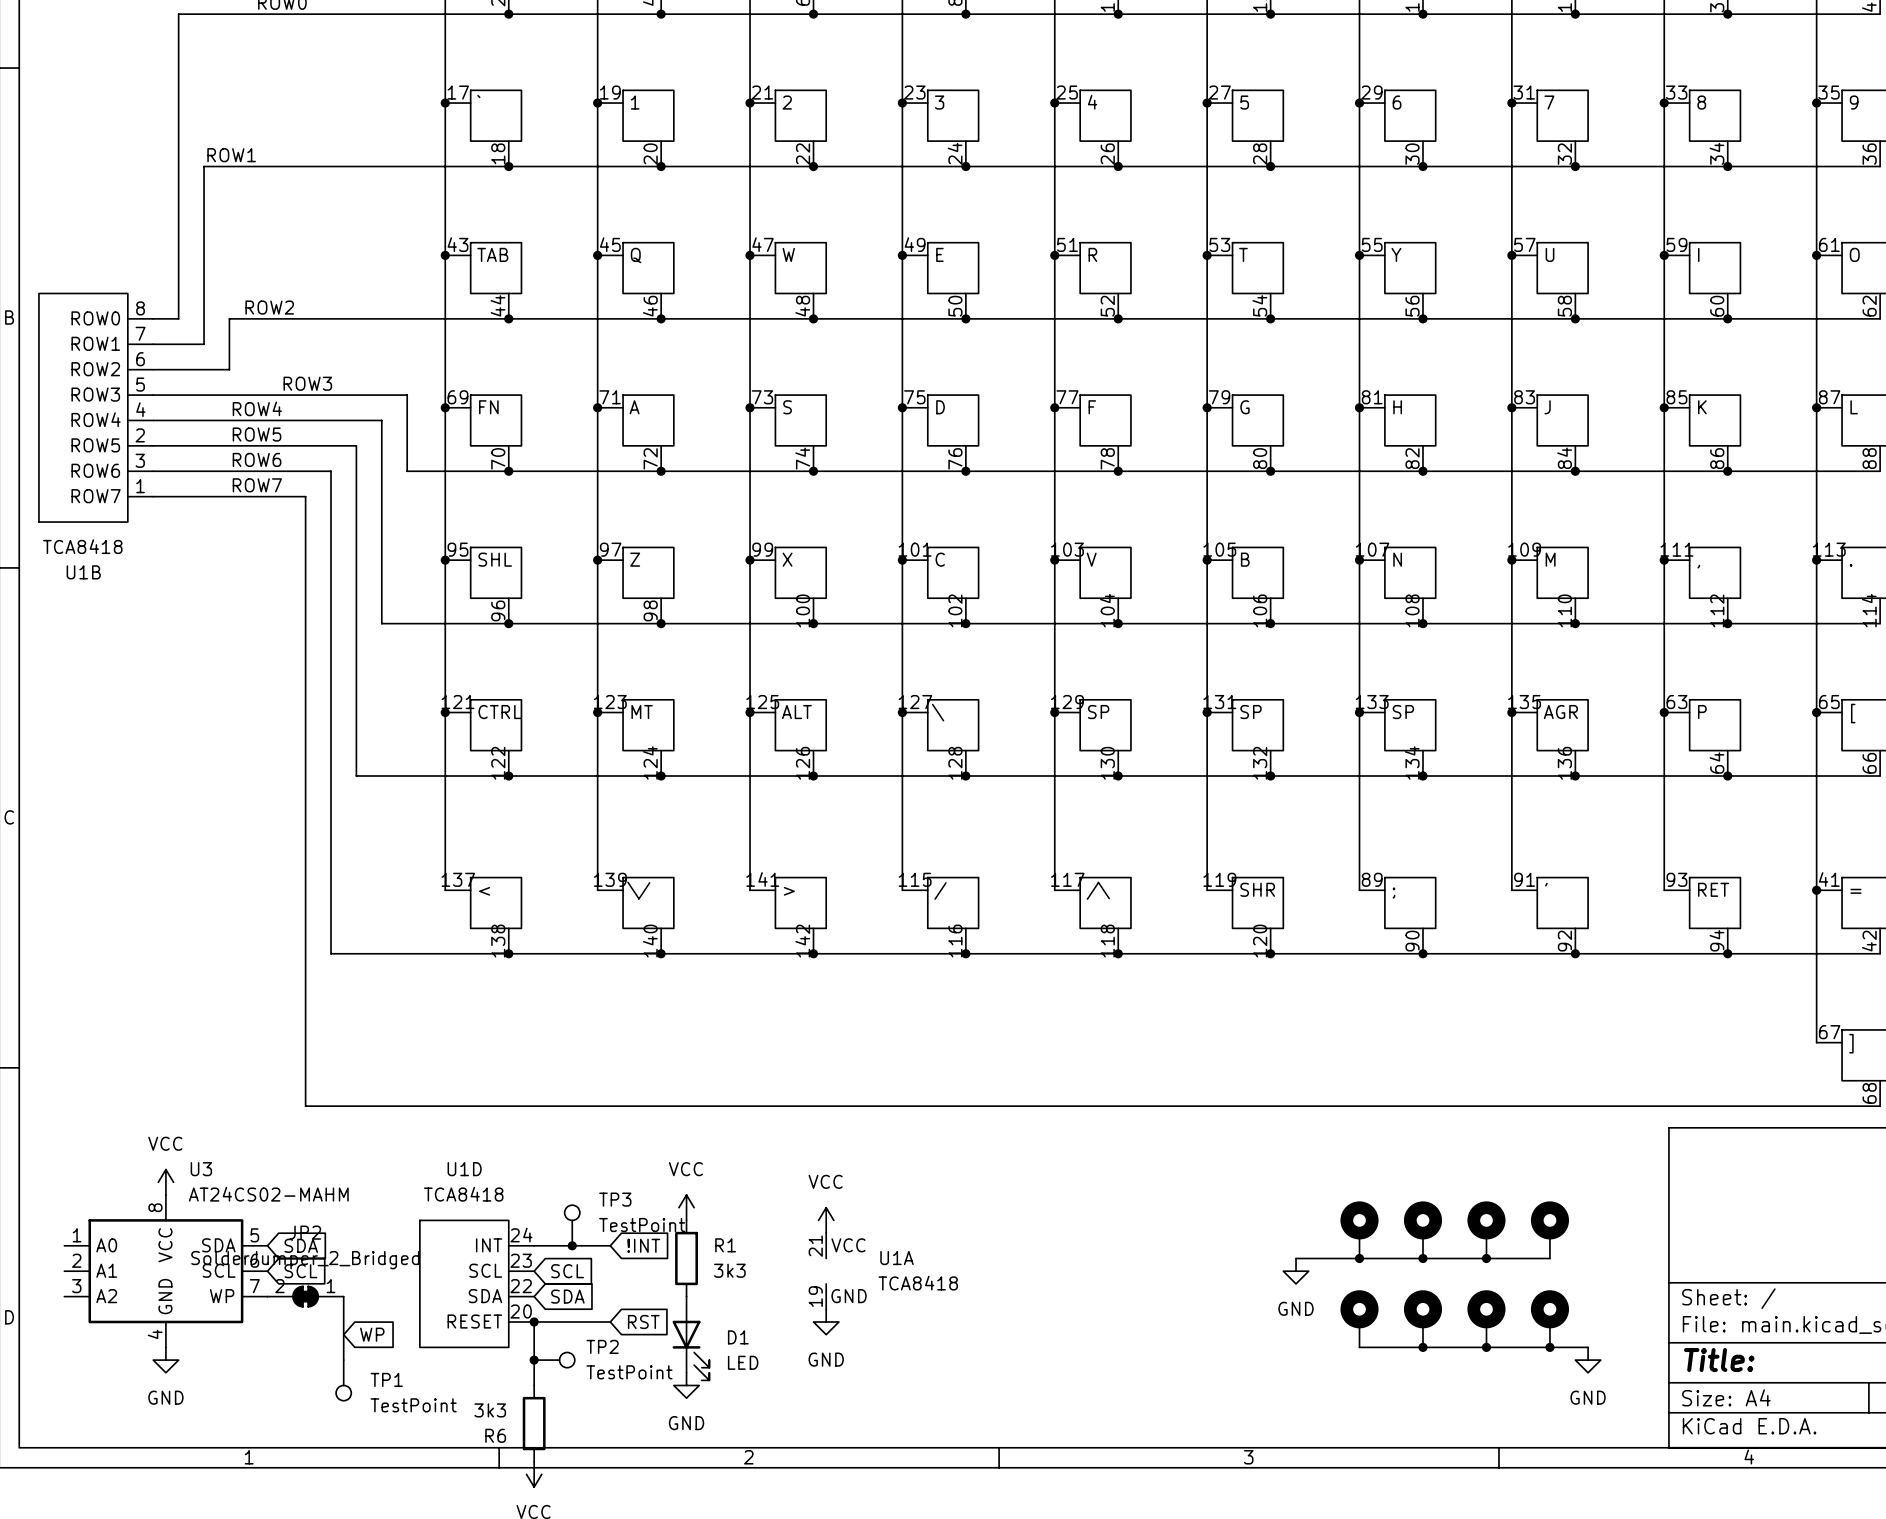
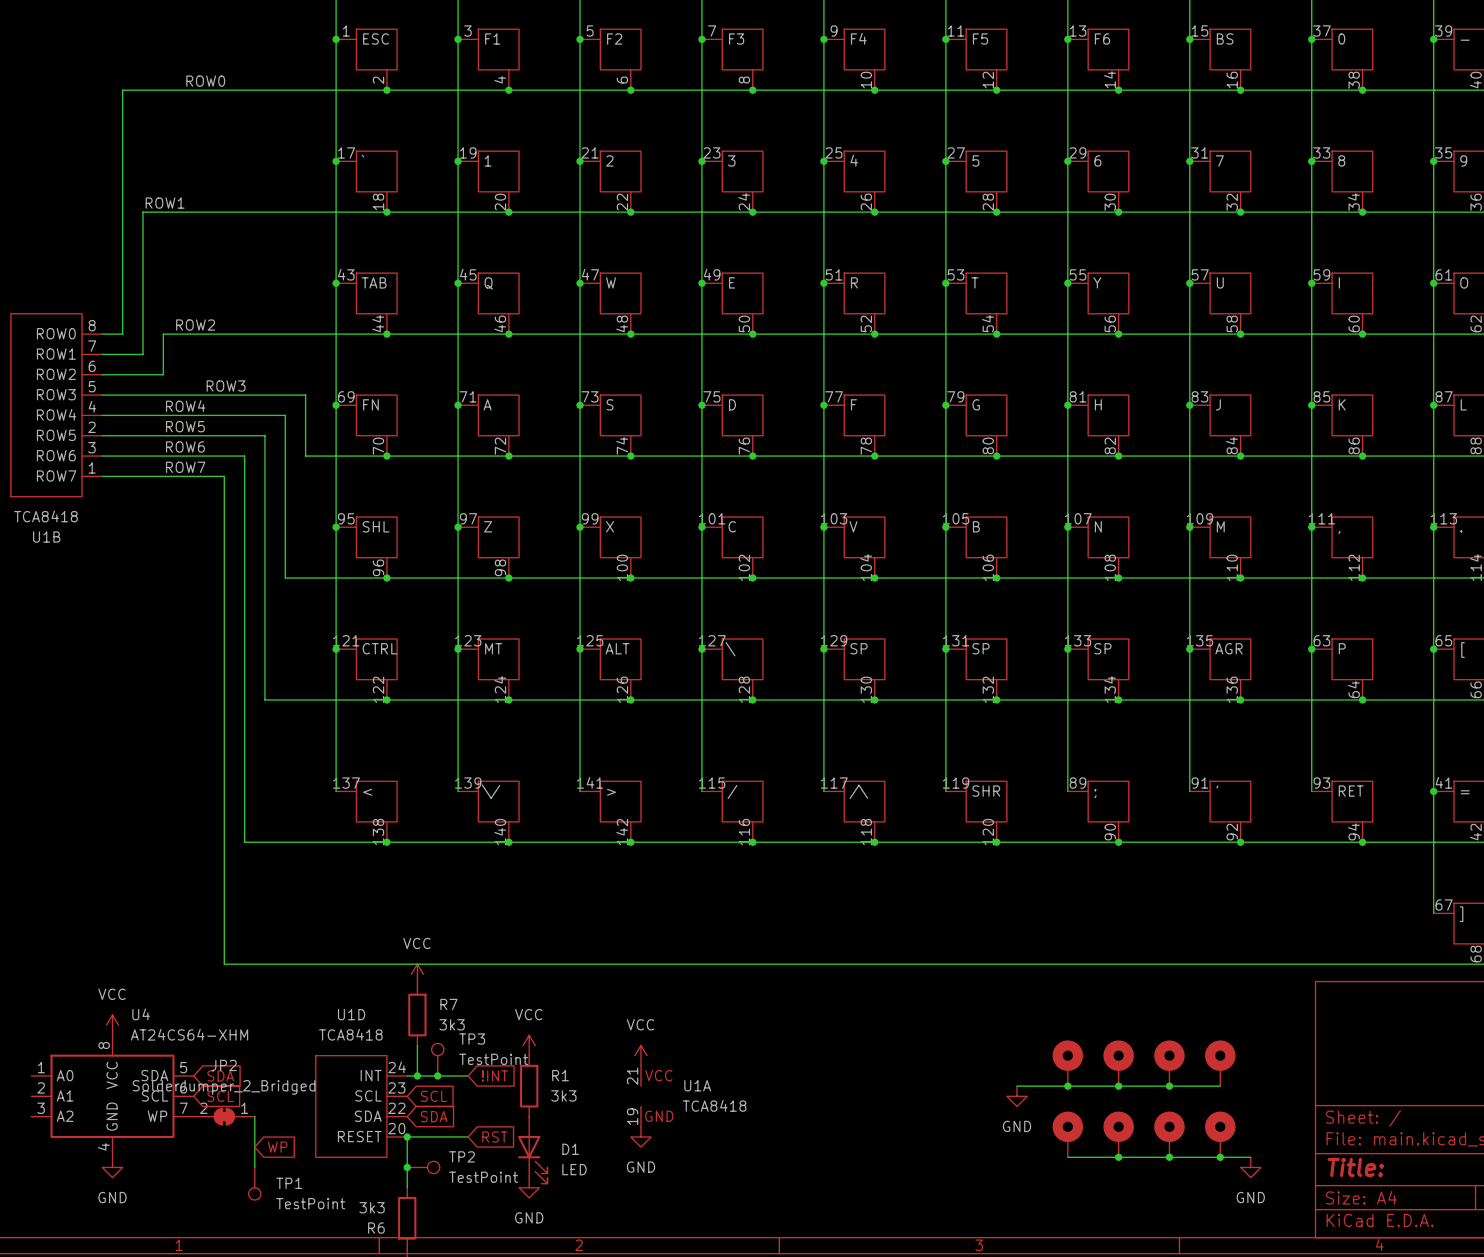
power symbol: none -> VCC (417, 974)
U3 name: U3 (201, 1169) -> U4 (141, 1014)
R7: none -> 3k3 (417, 1015)
U3 value: AT24CS02-MAHM (268, 1194) -> AT24CS64-XHM (189, 1034)
wire: none -> (417, 1045) (417, 1075)
junction: none -> (417, 1075)

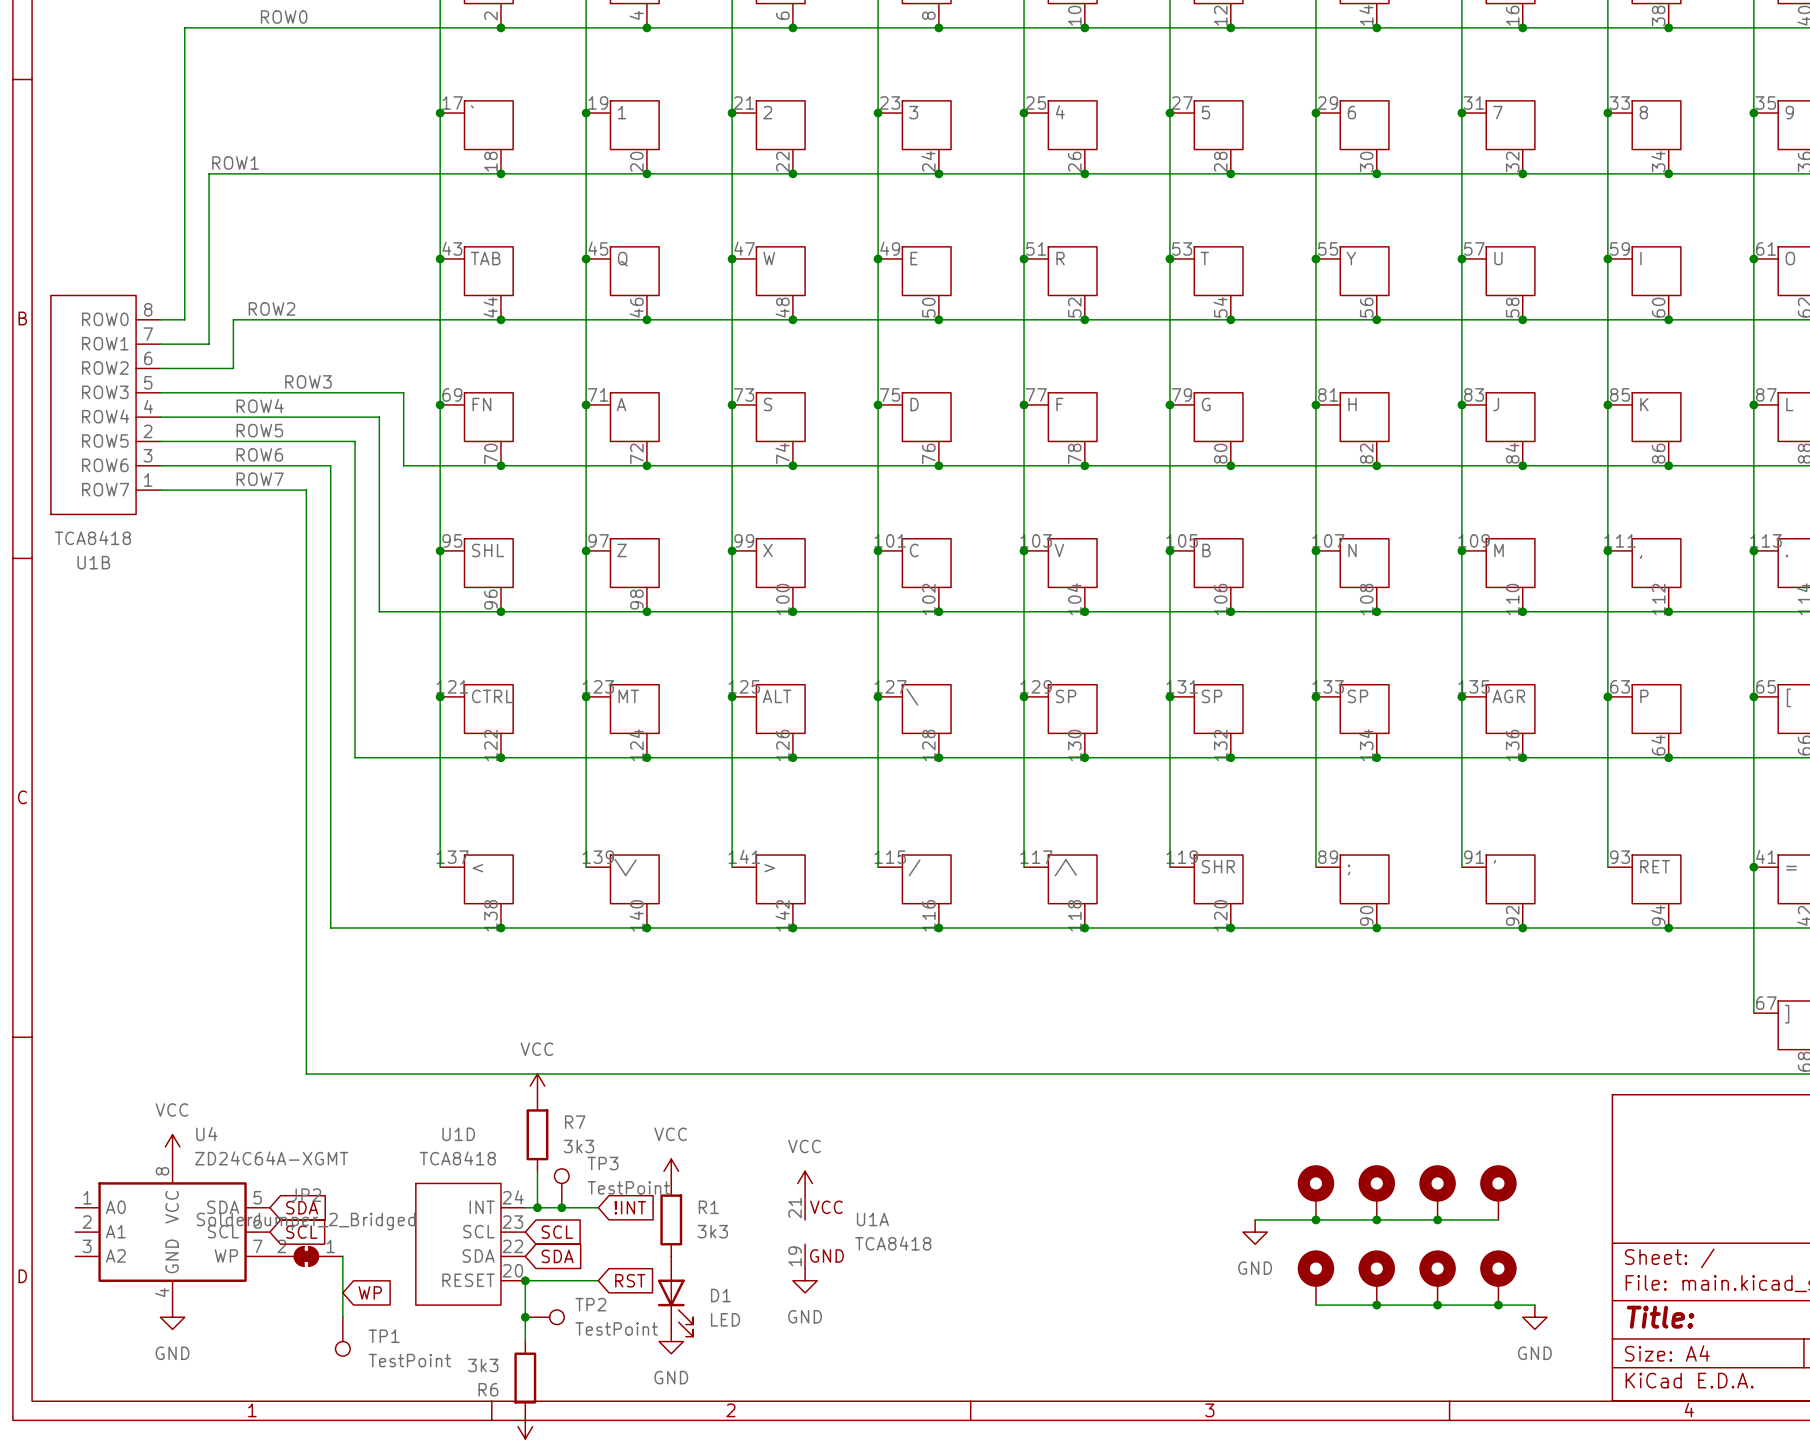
U4 value: AT24CS64-XHM (189, 1034) -> ZD24C64A-XGMT (271, 1158)

